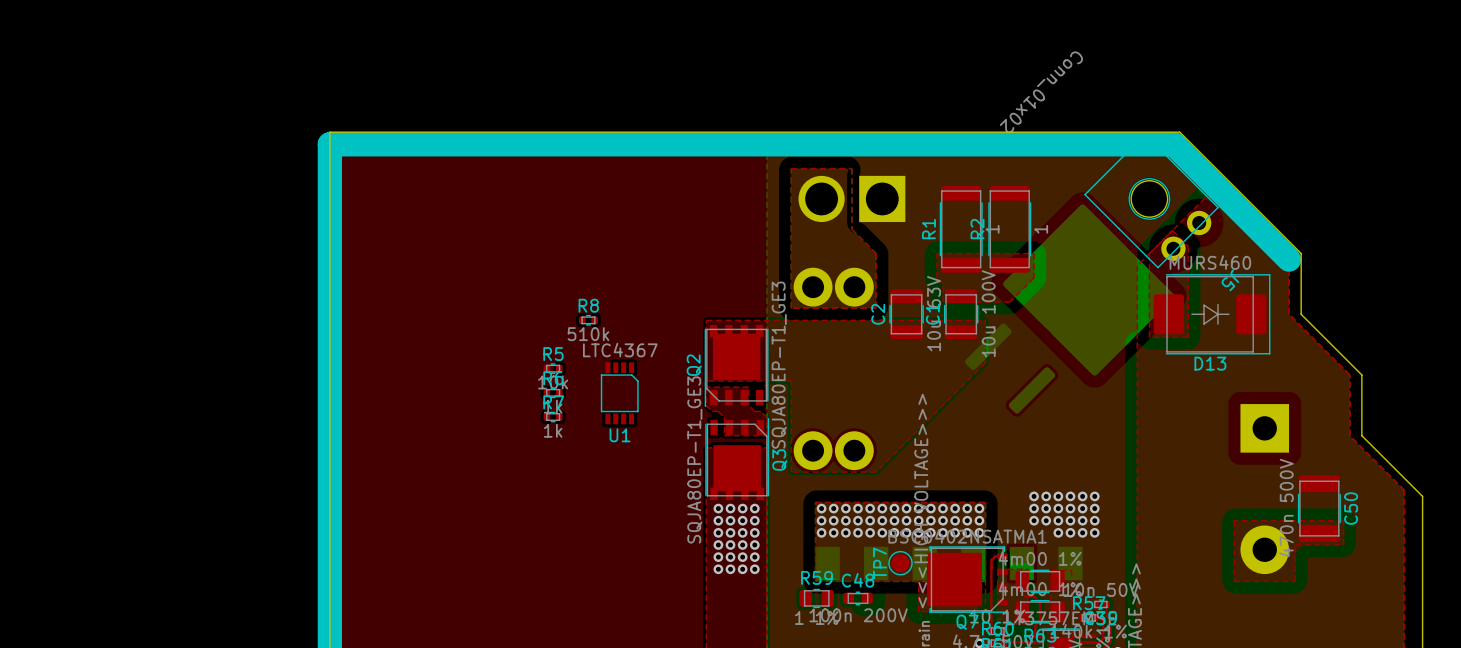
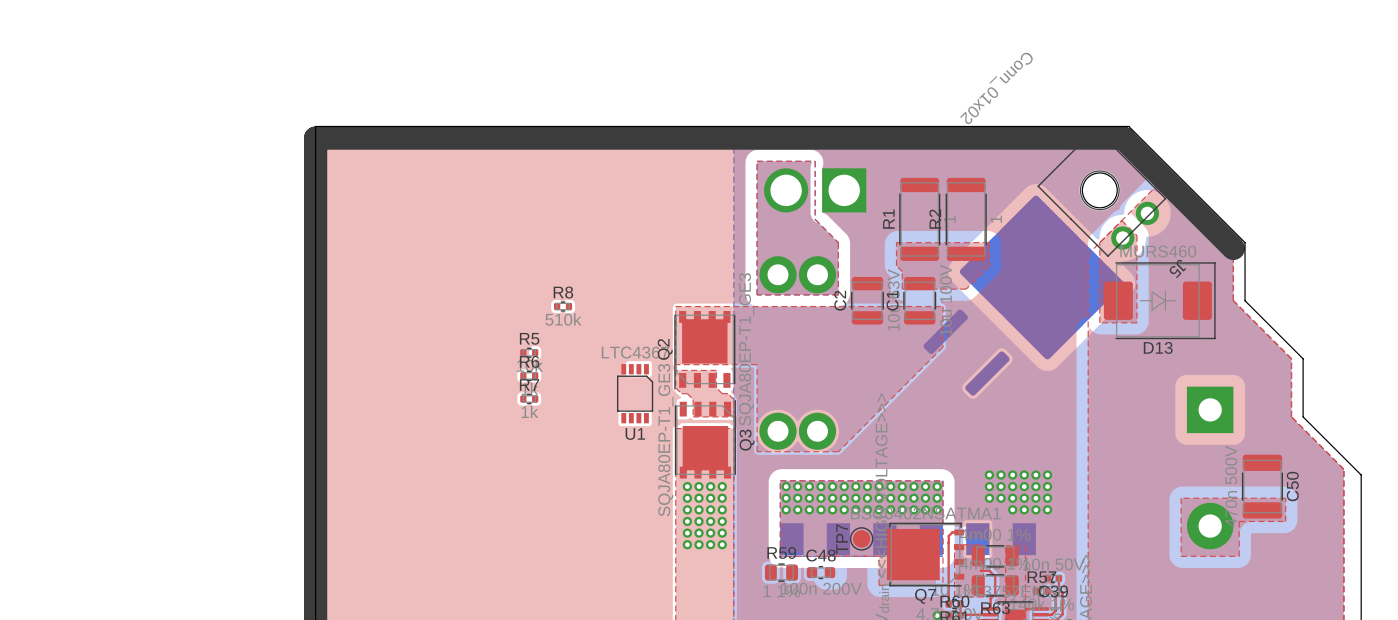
U1 position: (619, 393) -> (635, 393)

